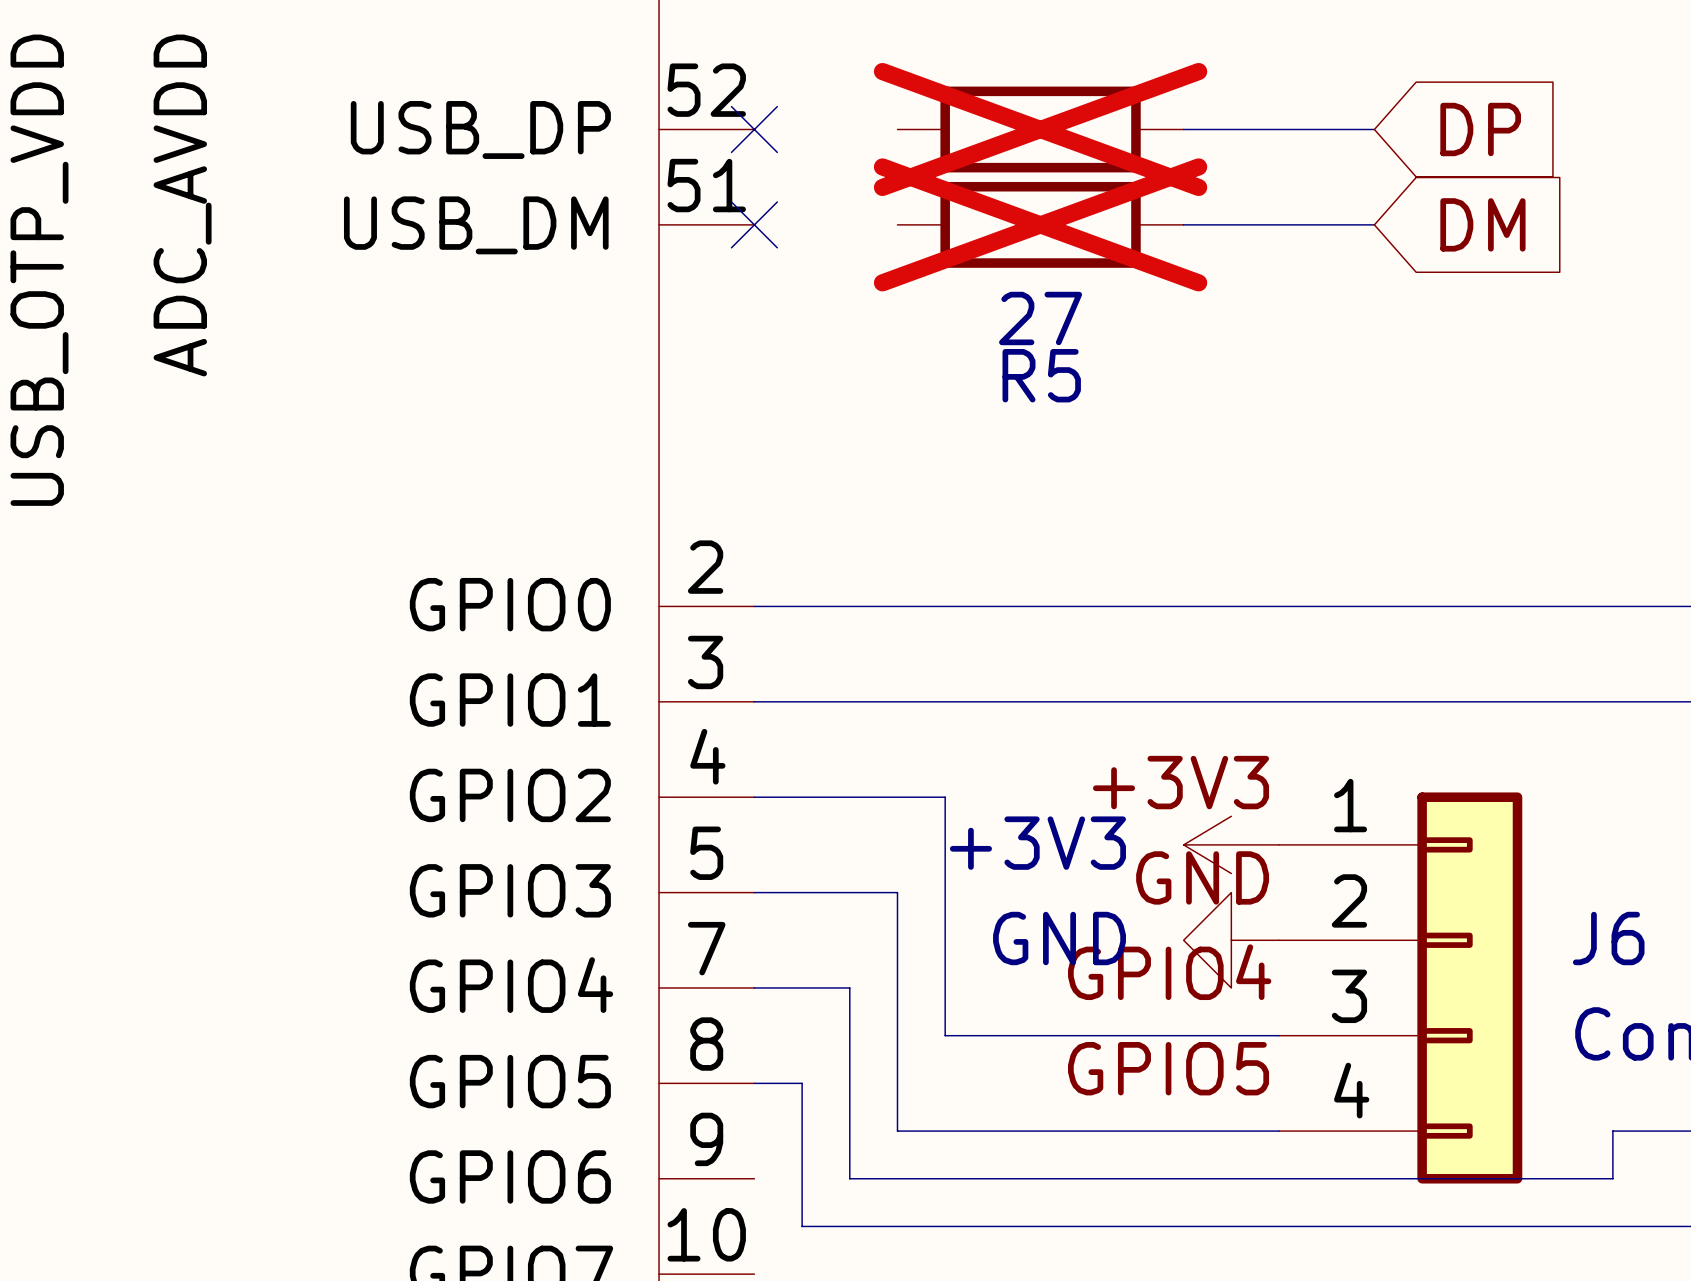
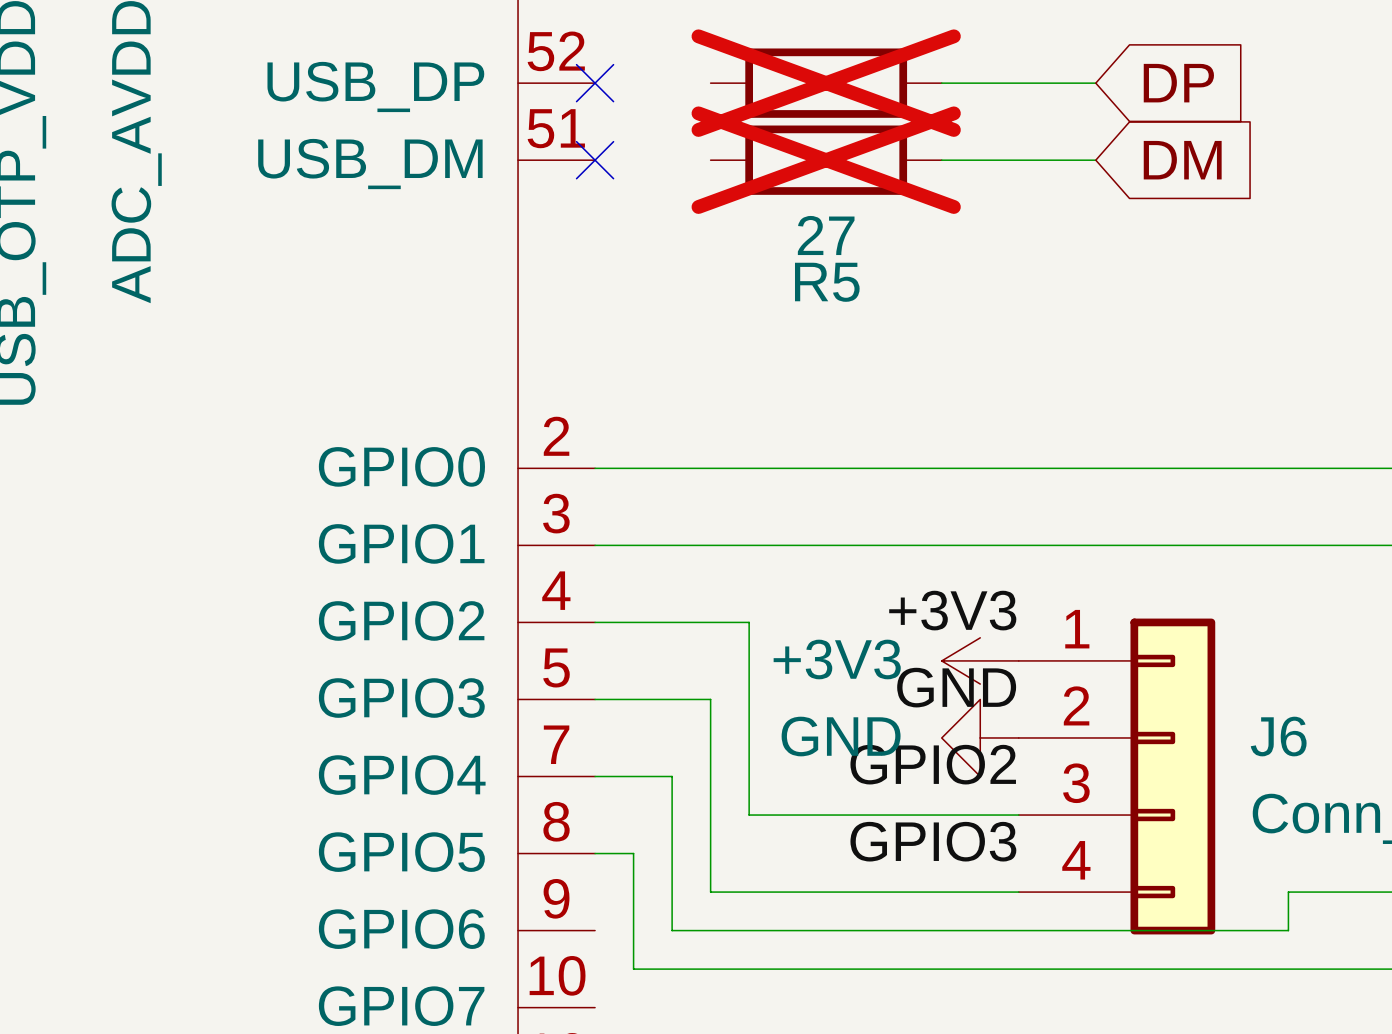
label: GPIO4 (1169, 972) -> GPIO2 (933, 764)
label: GPIO5 (1168, 1068) -> GPIO3 (933, 841)

